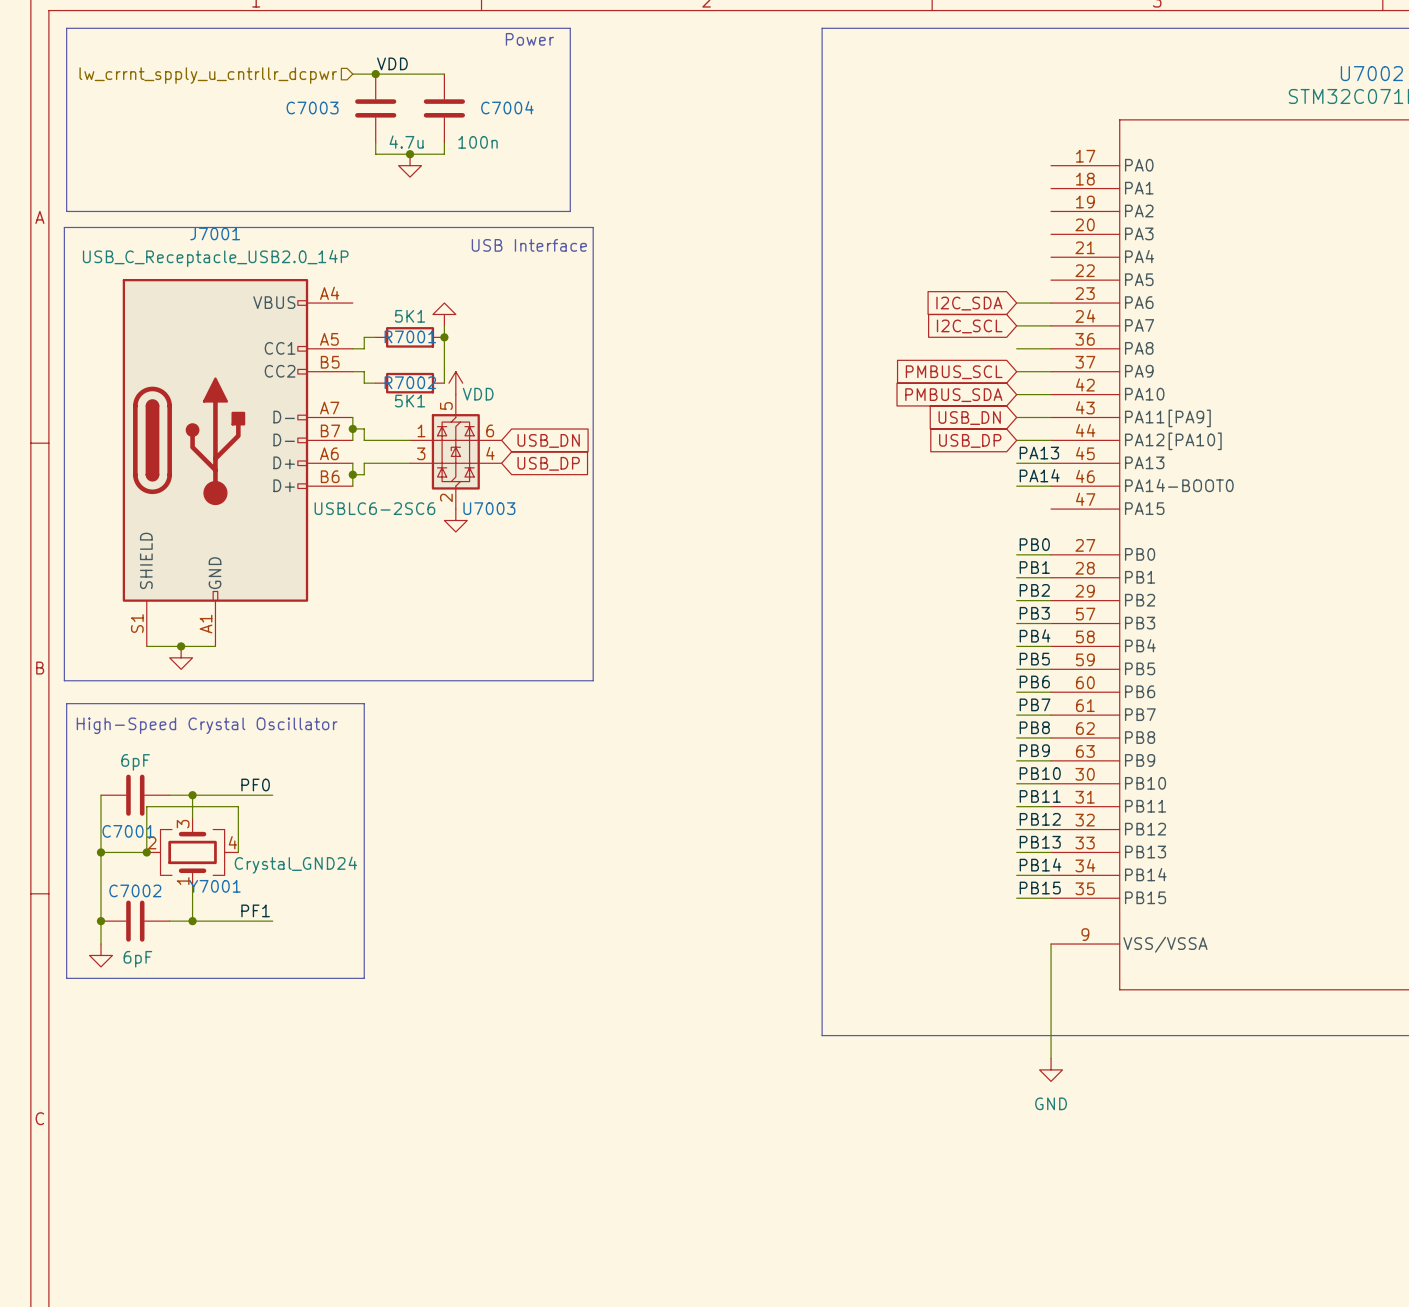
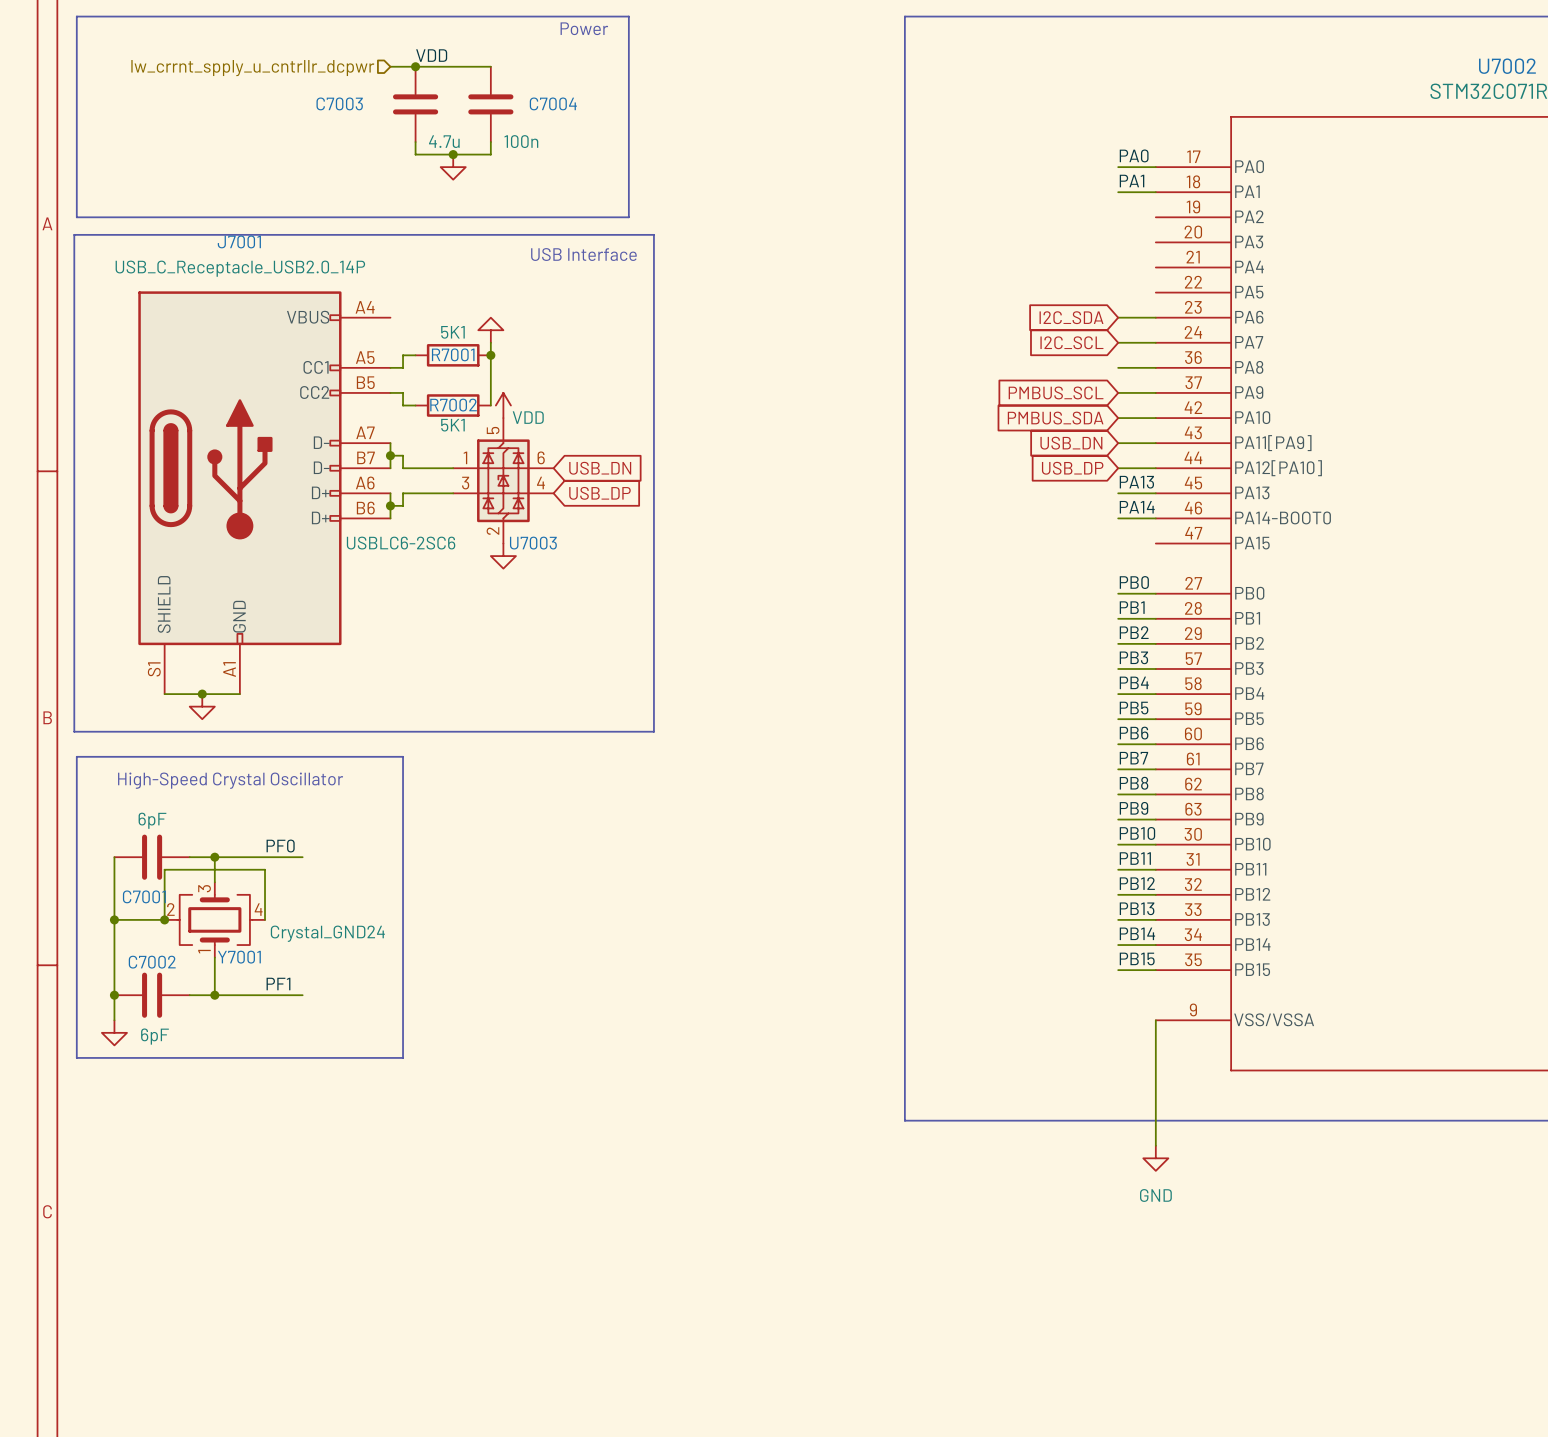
label: none -> PA0 (1134, 155)
wire: none -> (1118, 167) (1155, 167)
label: none -> PA1 (1132, 181)
wire: none -> (1118, 192) (1155, 192)

